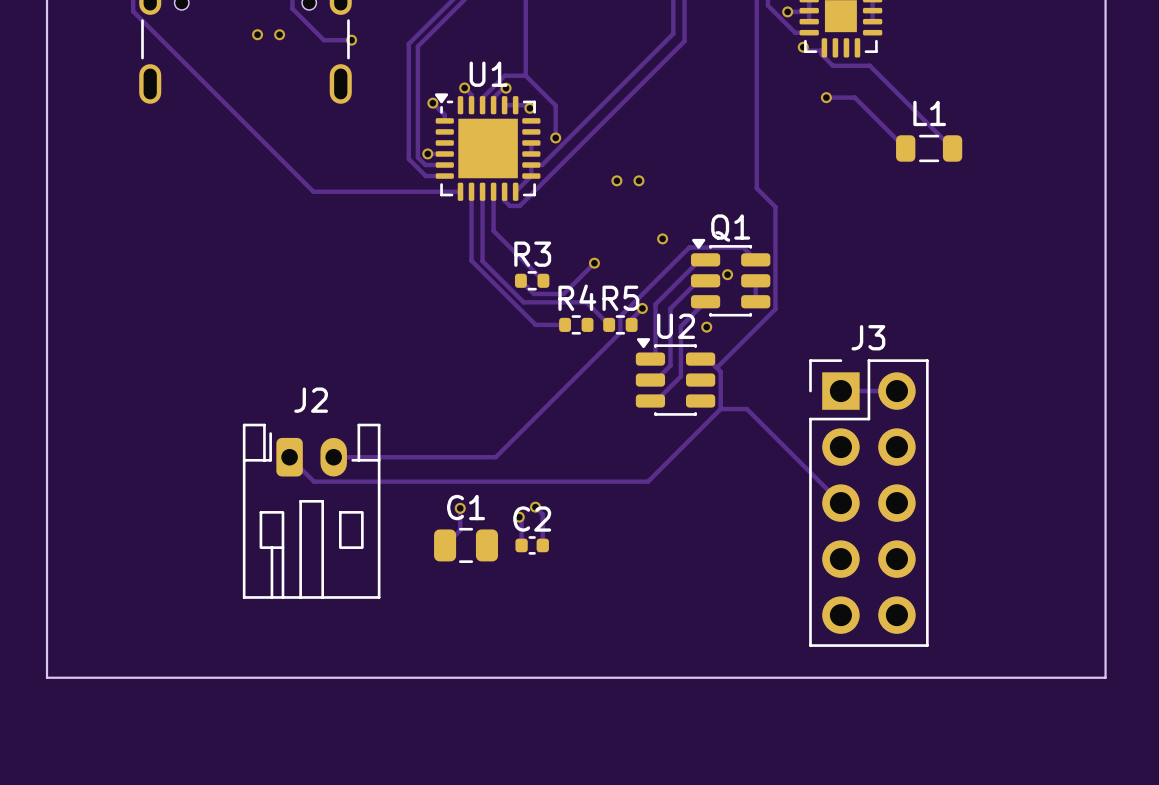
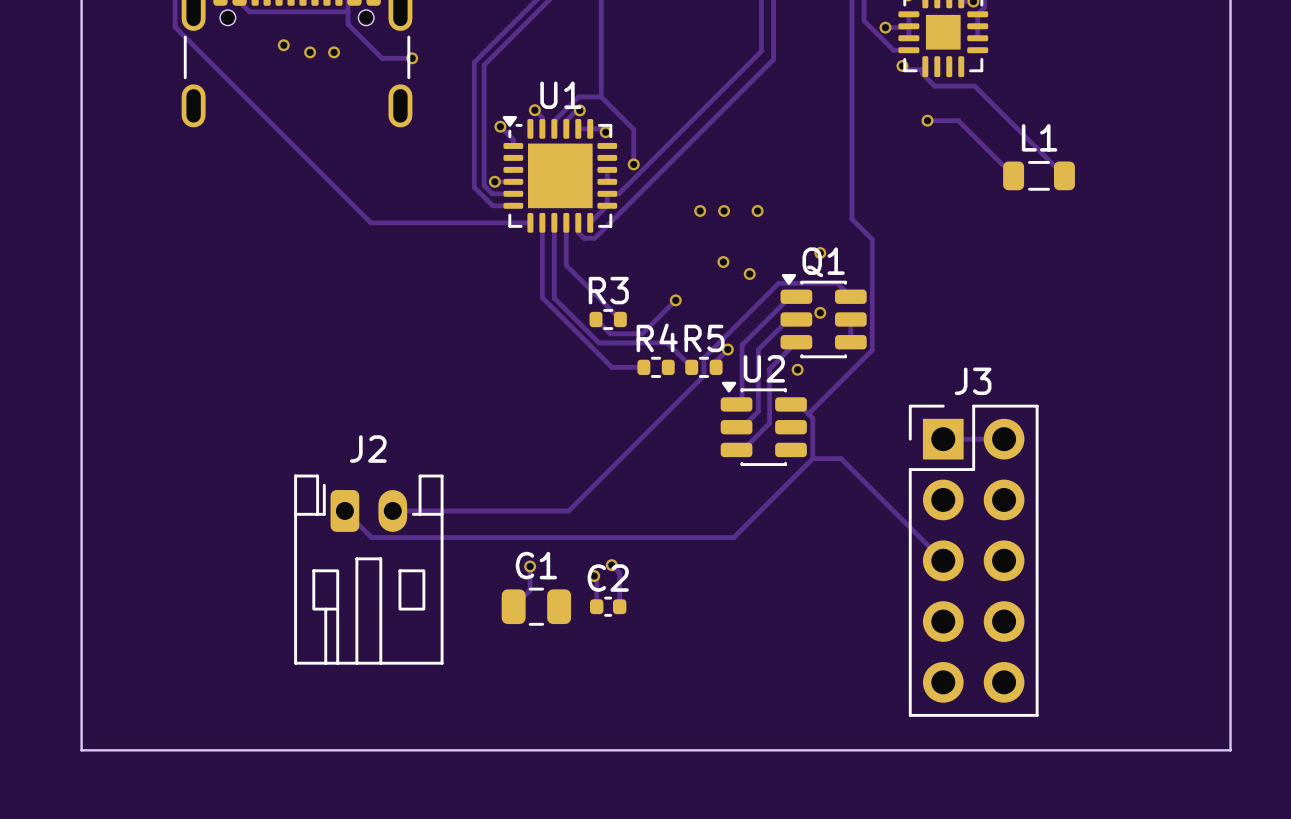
via: none -> (283, 45)
via: none -> (757, 210)
via: none -> (820, 253)
via: none -> (723, 262)

